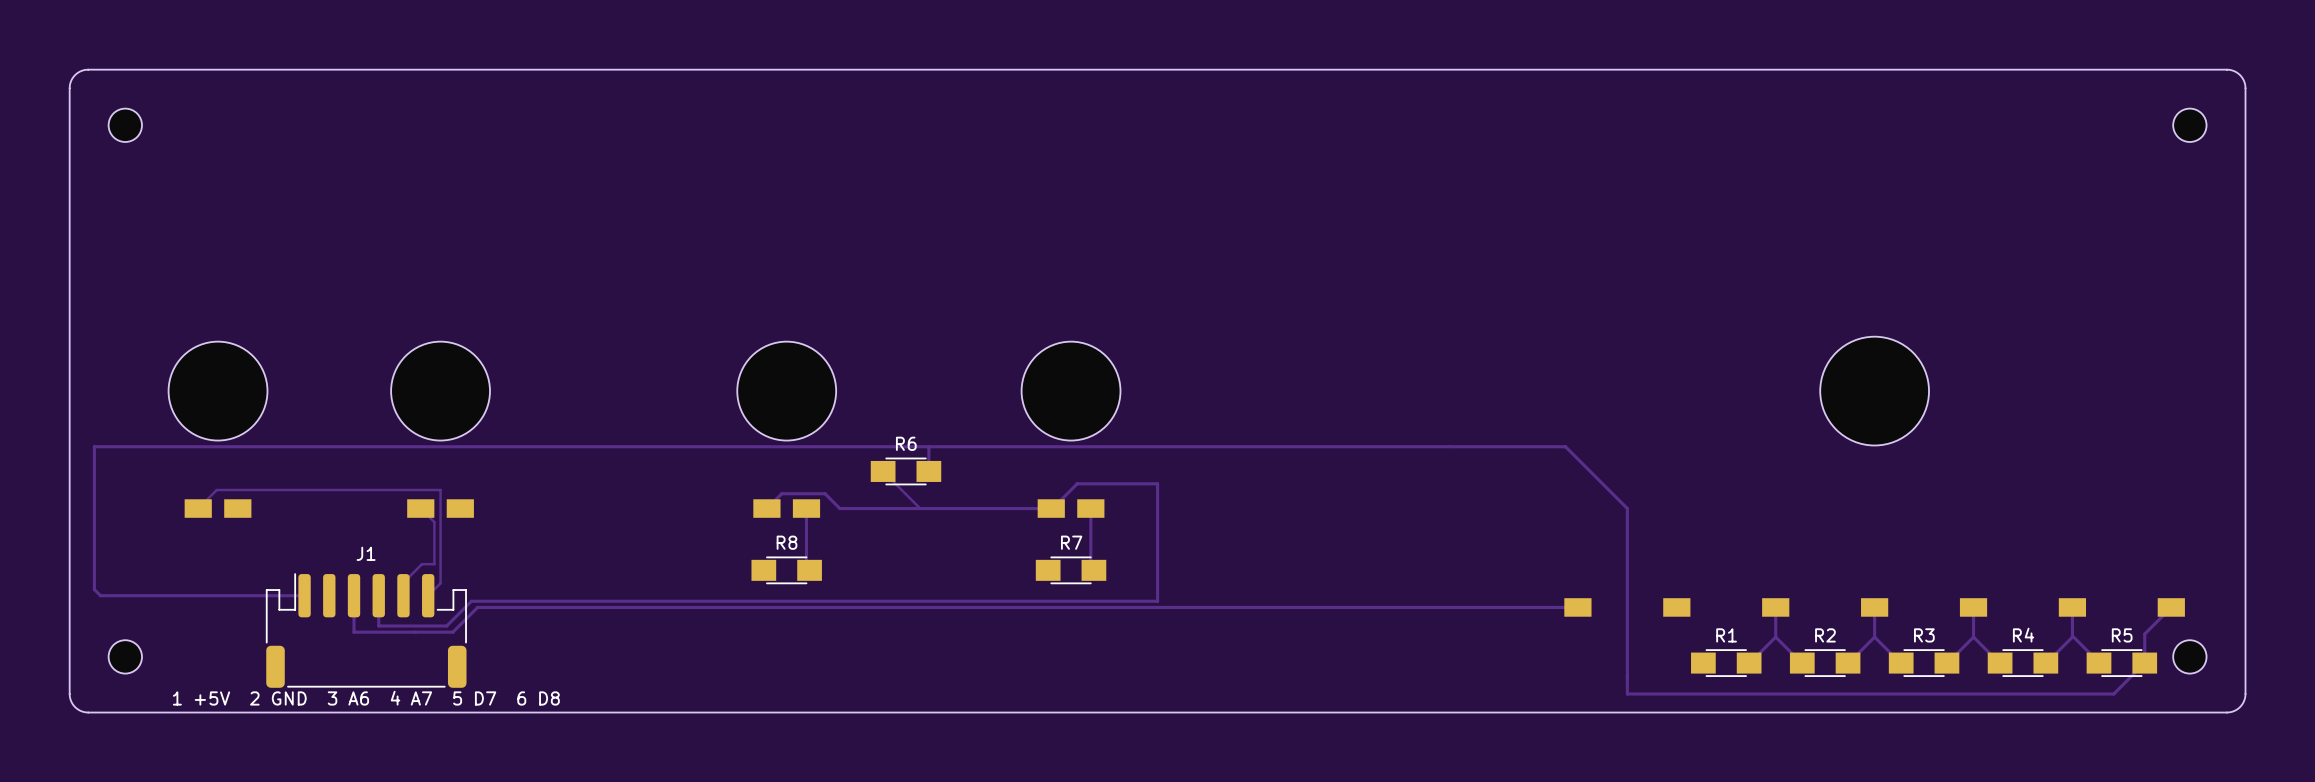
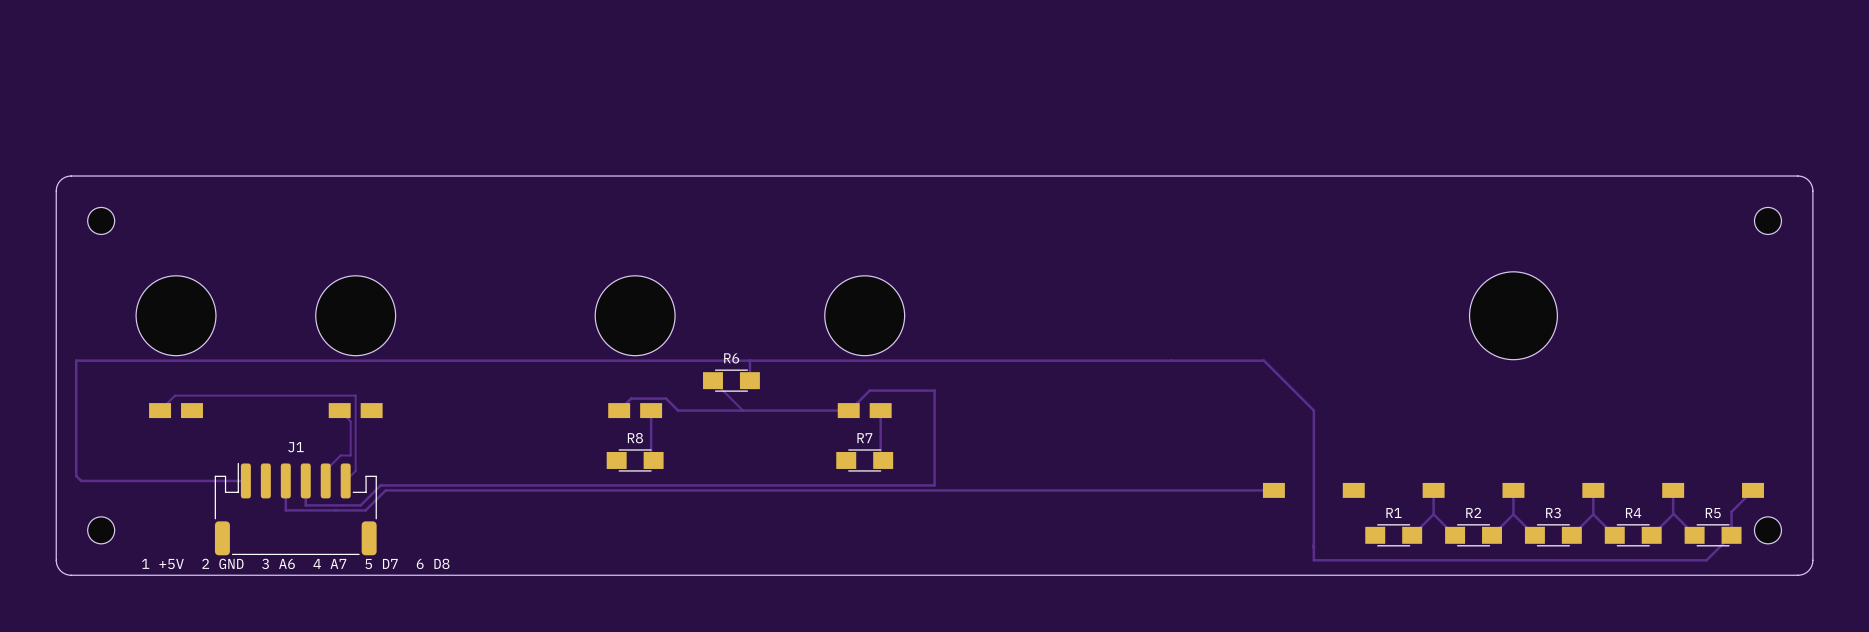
part position: (125, 125) -> (101, 220)
part position: (2189, 125) -> (1767, 220)
board edge: (2245, 236) (2245, 86) (2240, 75) (2226, 69) (86, 69) (75, 75) (69, 86) (69, 236) -> (1812, 190) (1808, 180) (1797, 176) (71, 176) (60, 180) (56, 190)

